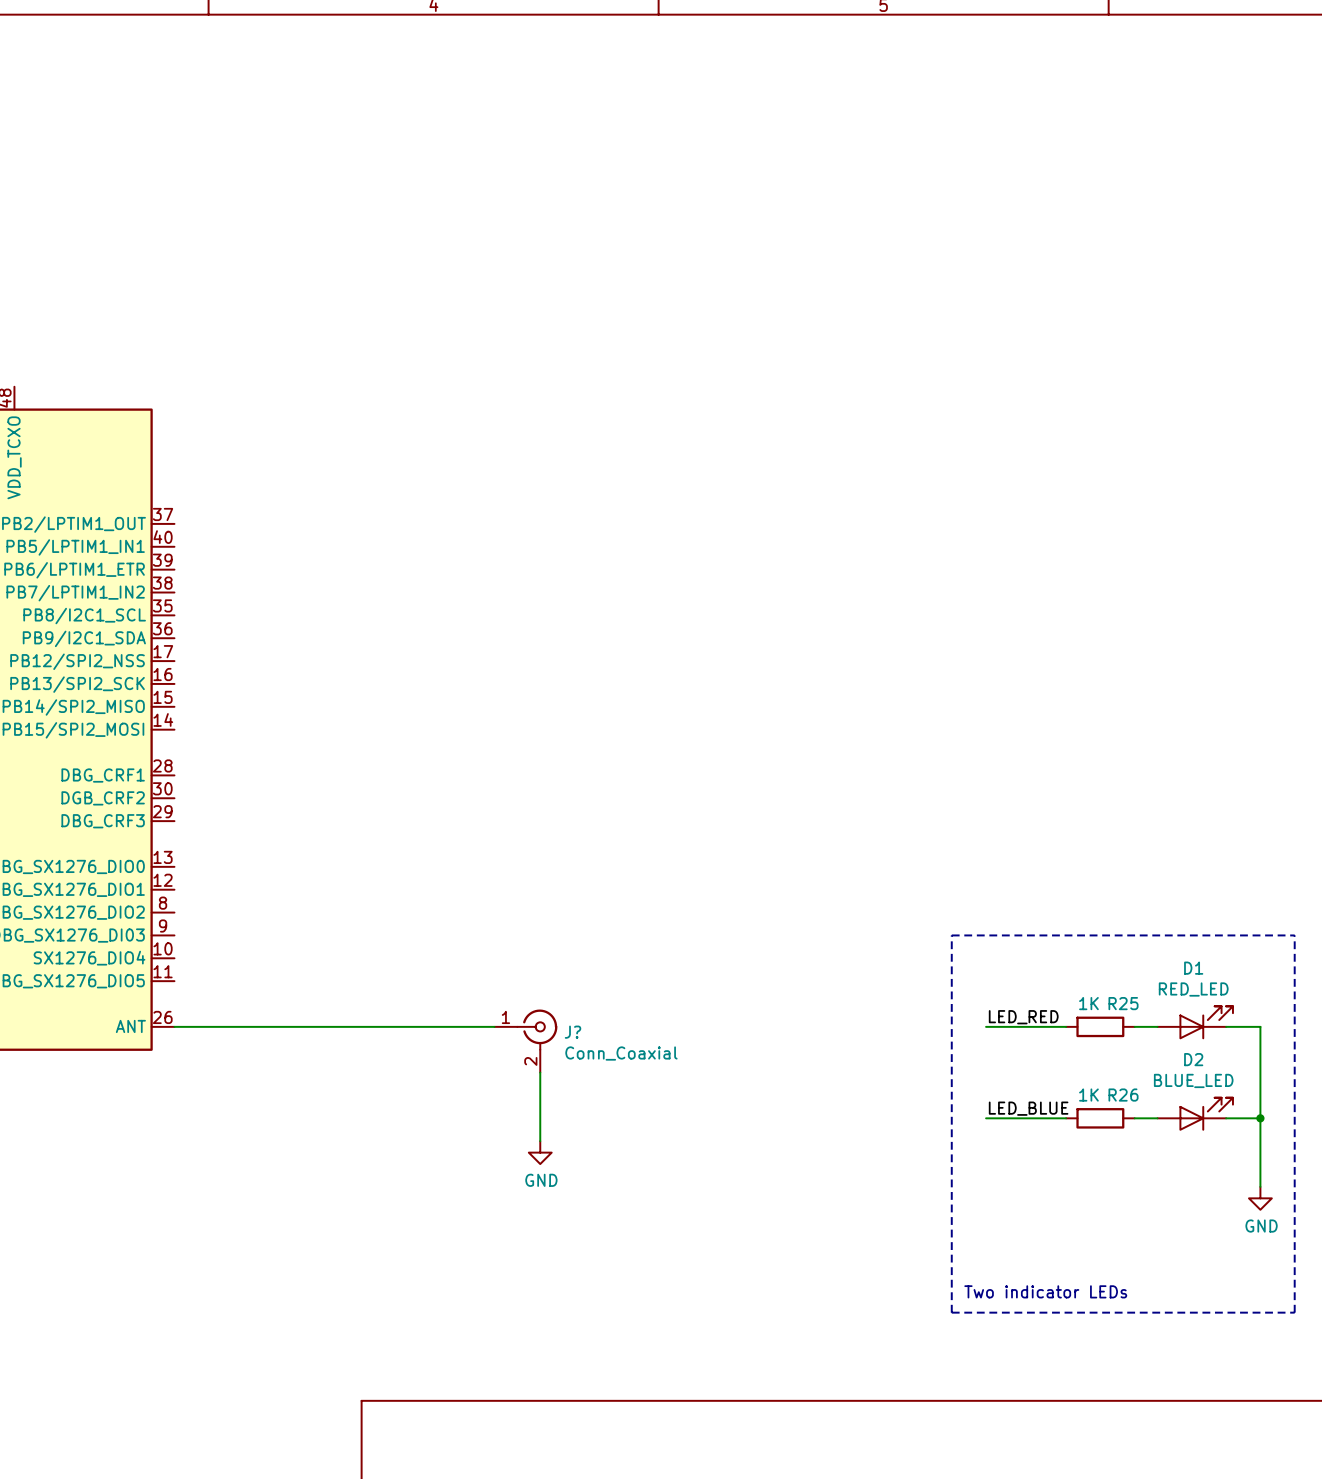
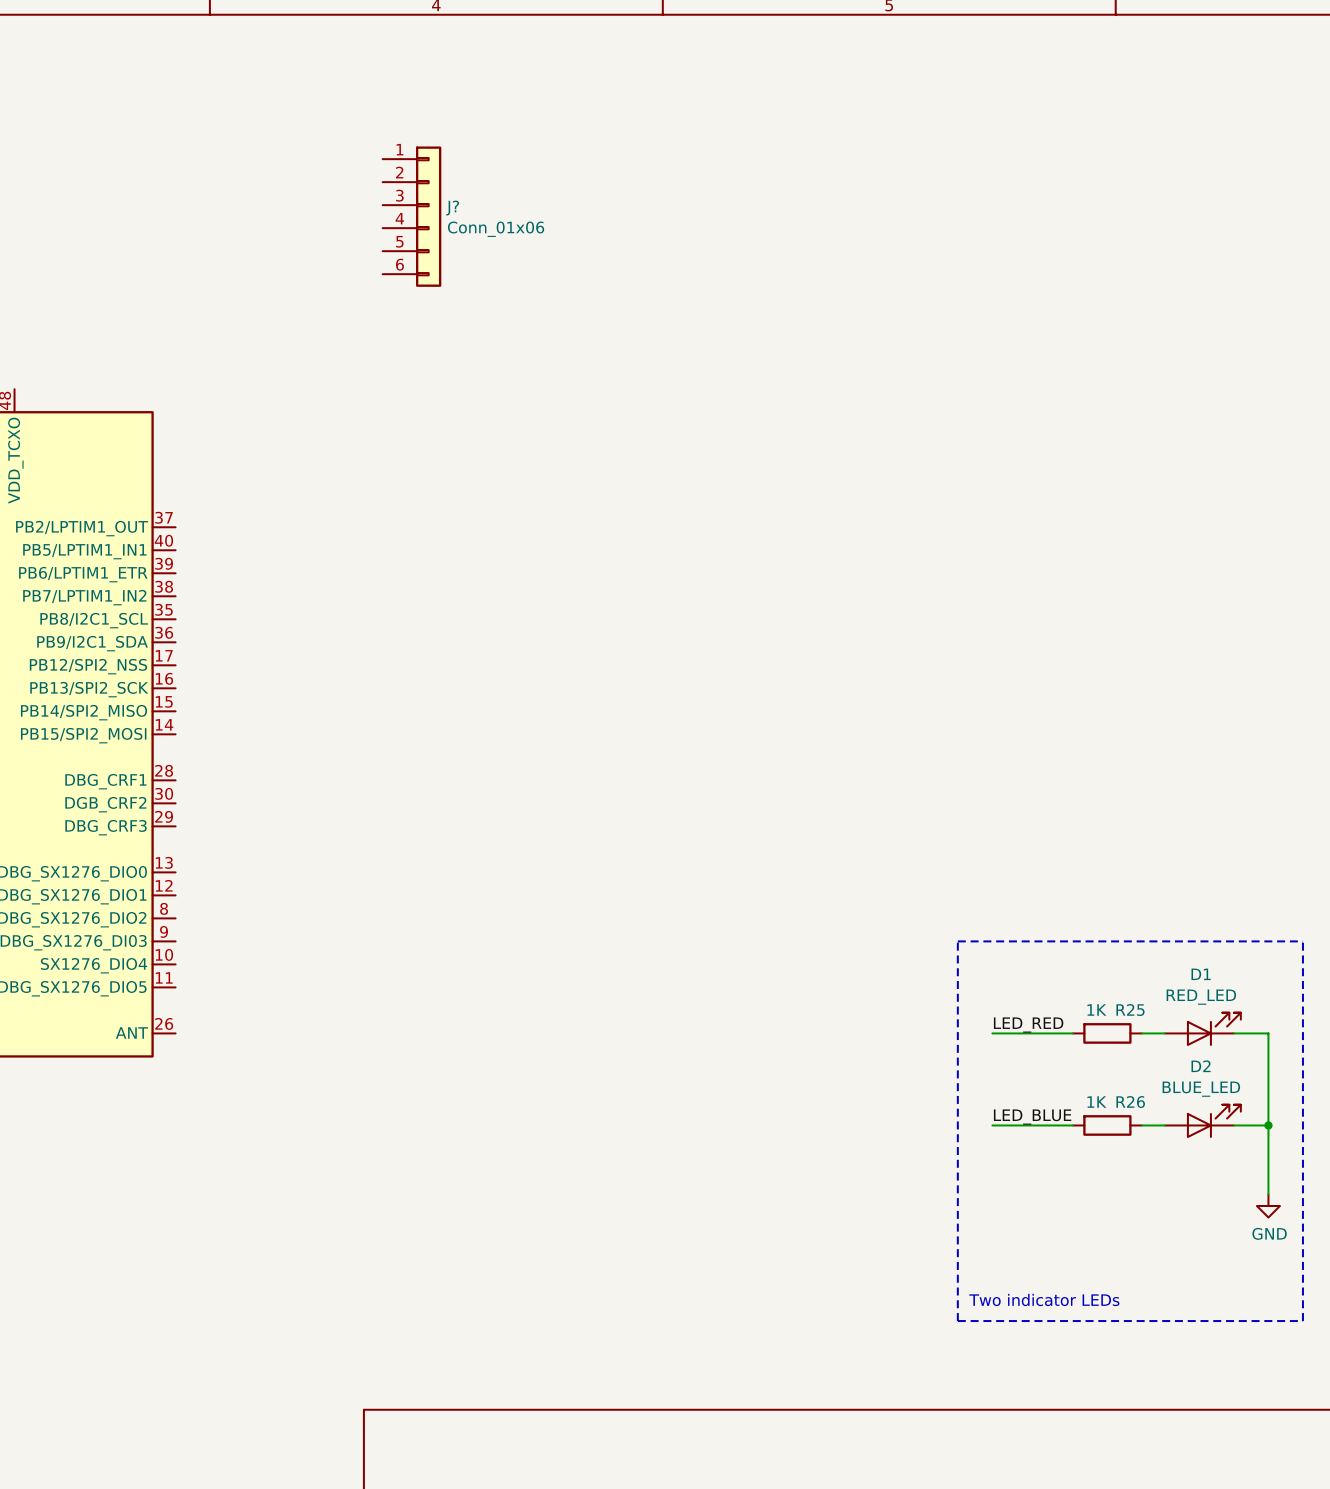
J?: none -> Conn_01x06 (411, 216)
wire: (174, 1026) (494, 1026) -> none
J?: Conn_Coaxial (525, 1041) -> none
wire: (540, 1072) (540, 1141) -> none
power symbol: GND (540, 1152) -> none

